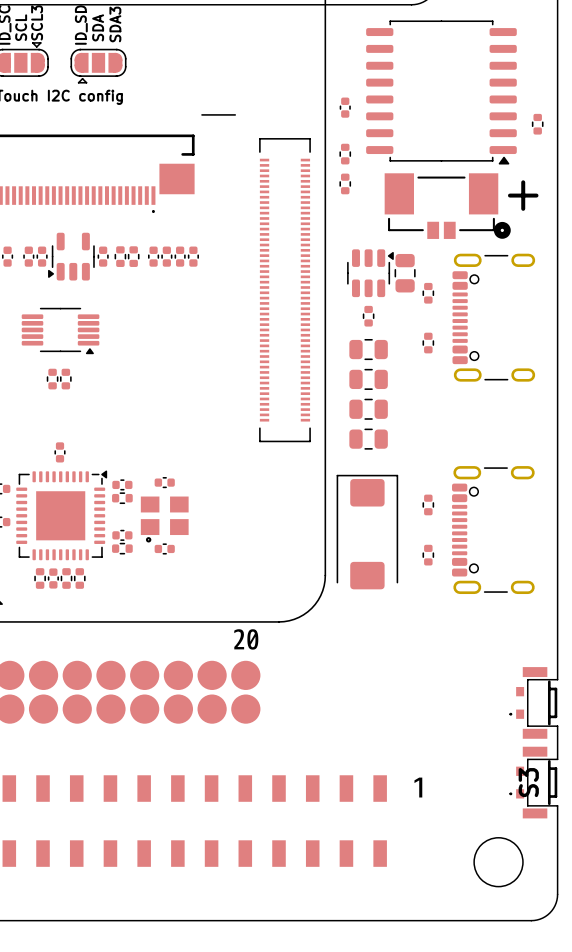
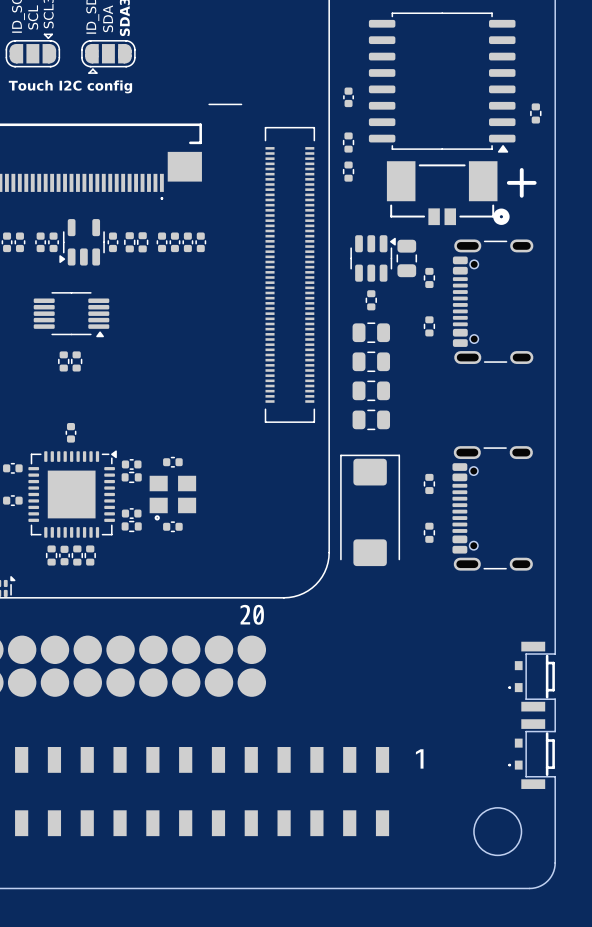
S3 name: S3 (528, 782) -> none

